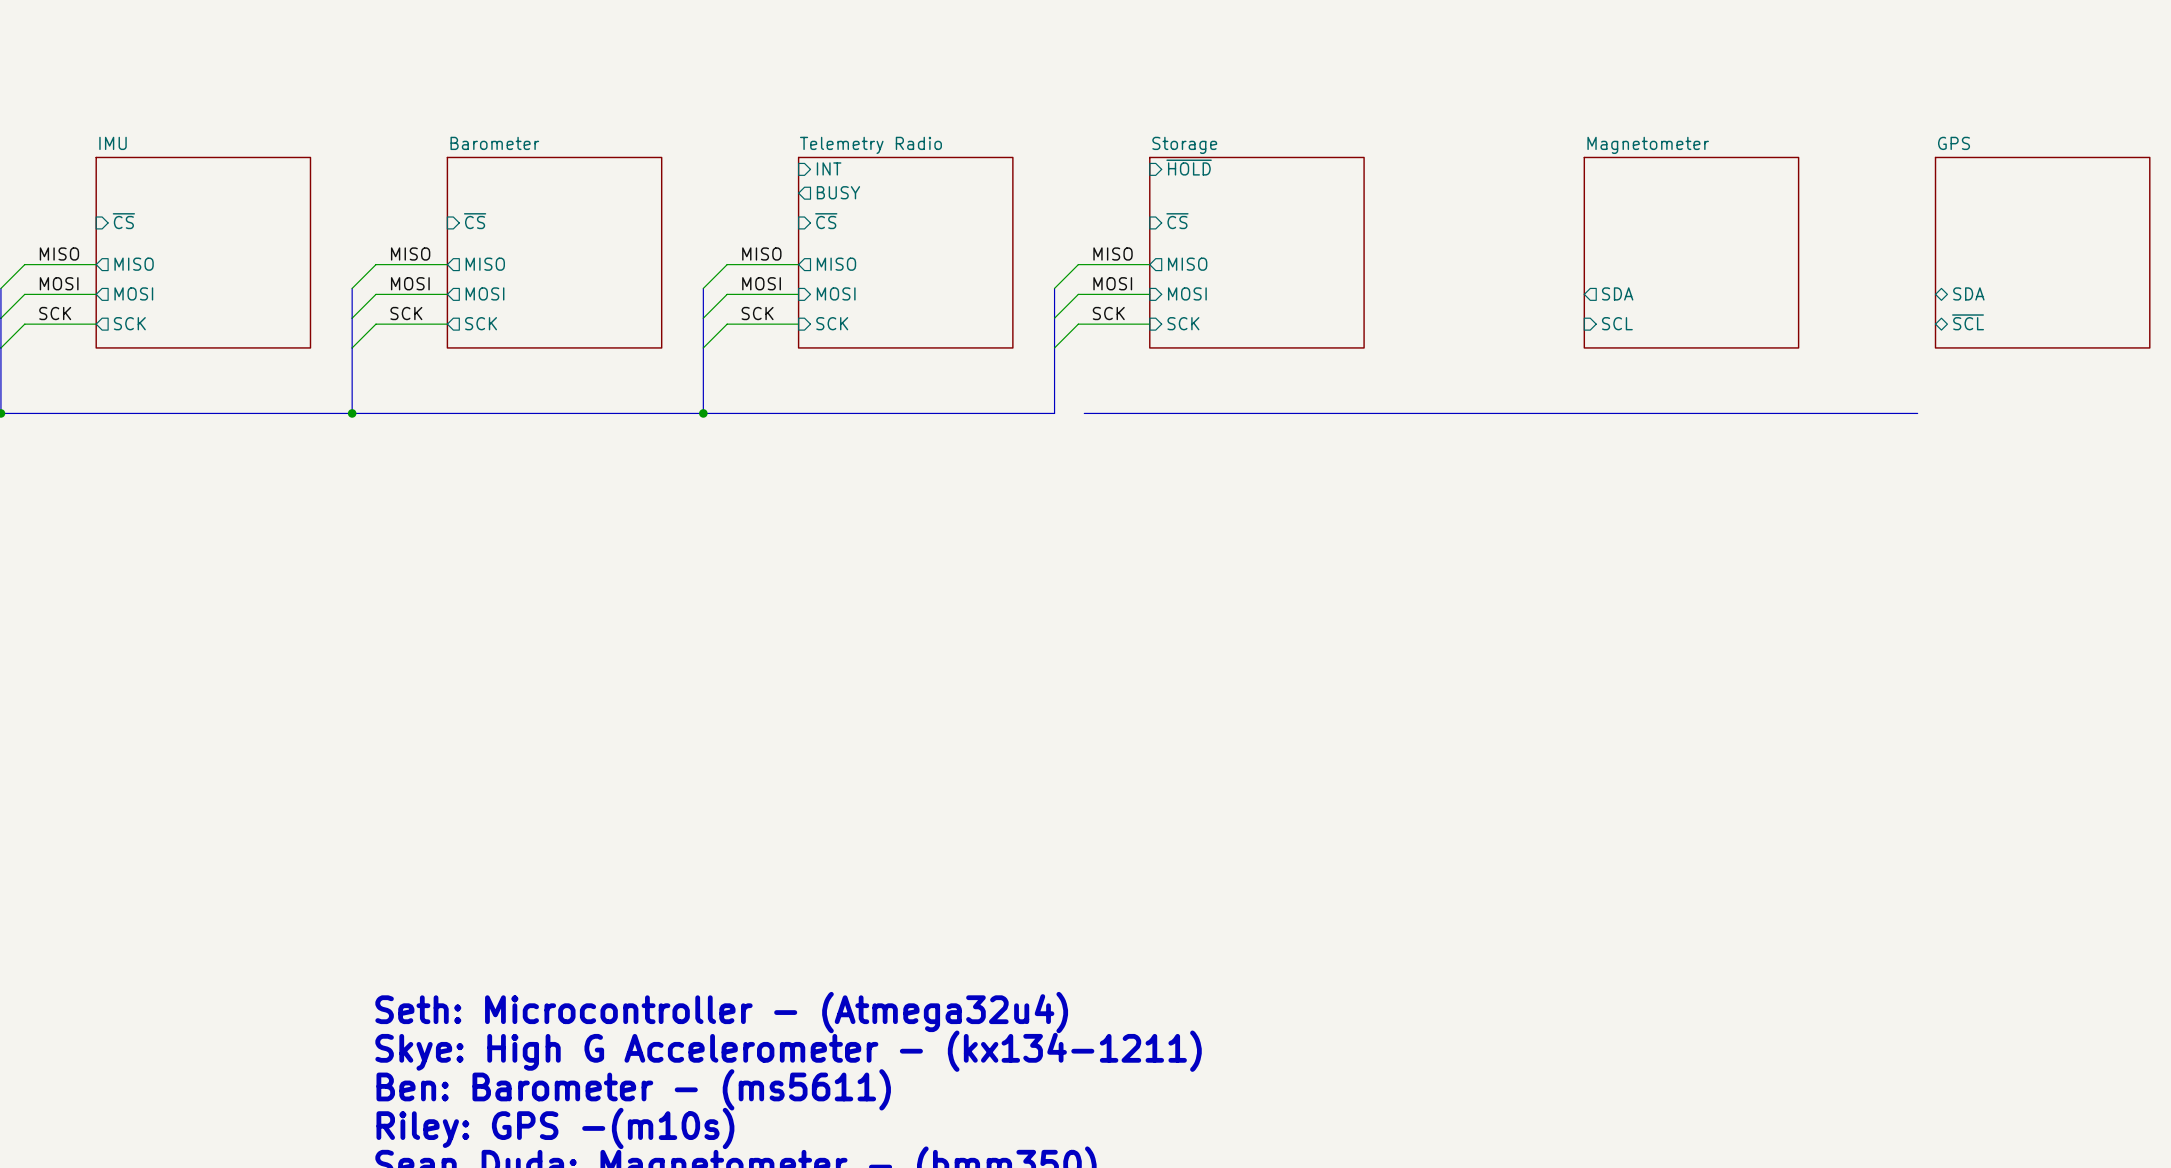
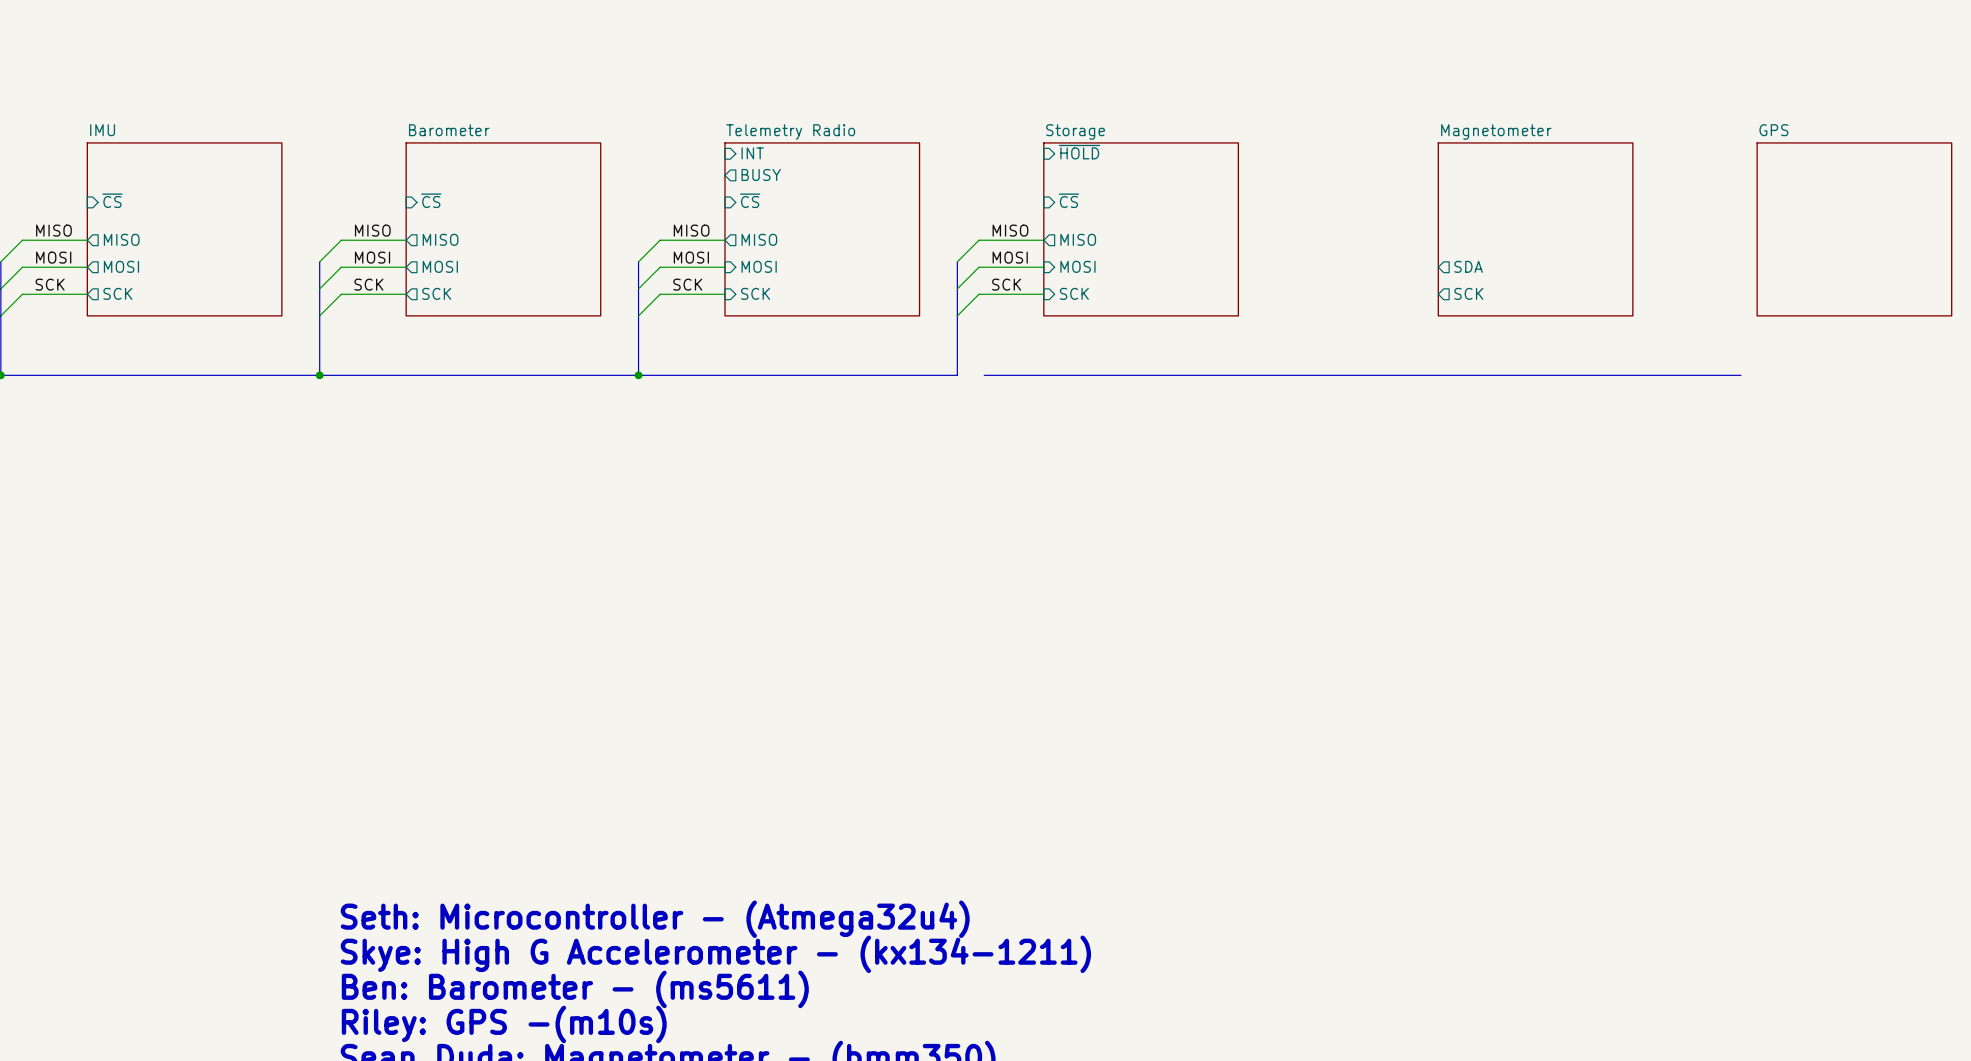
sheet pin: SDA (1968, 293) -> none
sheet pin: ~{SCL} (1968, 322) -> none
sheet pin shape: input (1617, 323) -> output (1468, 293)
sheet pin: SCL (1617, 323) -> SCK (1468, 293)

